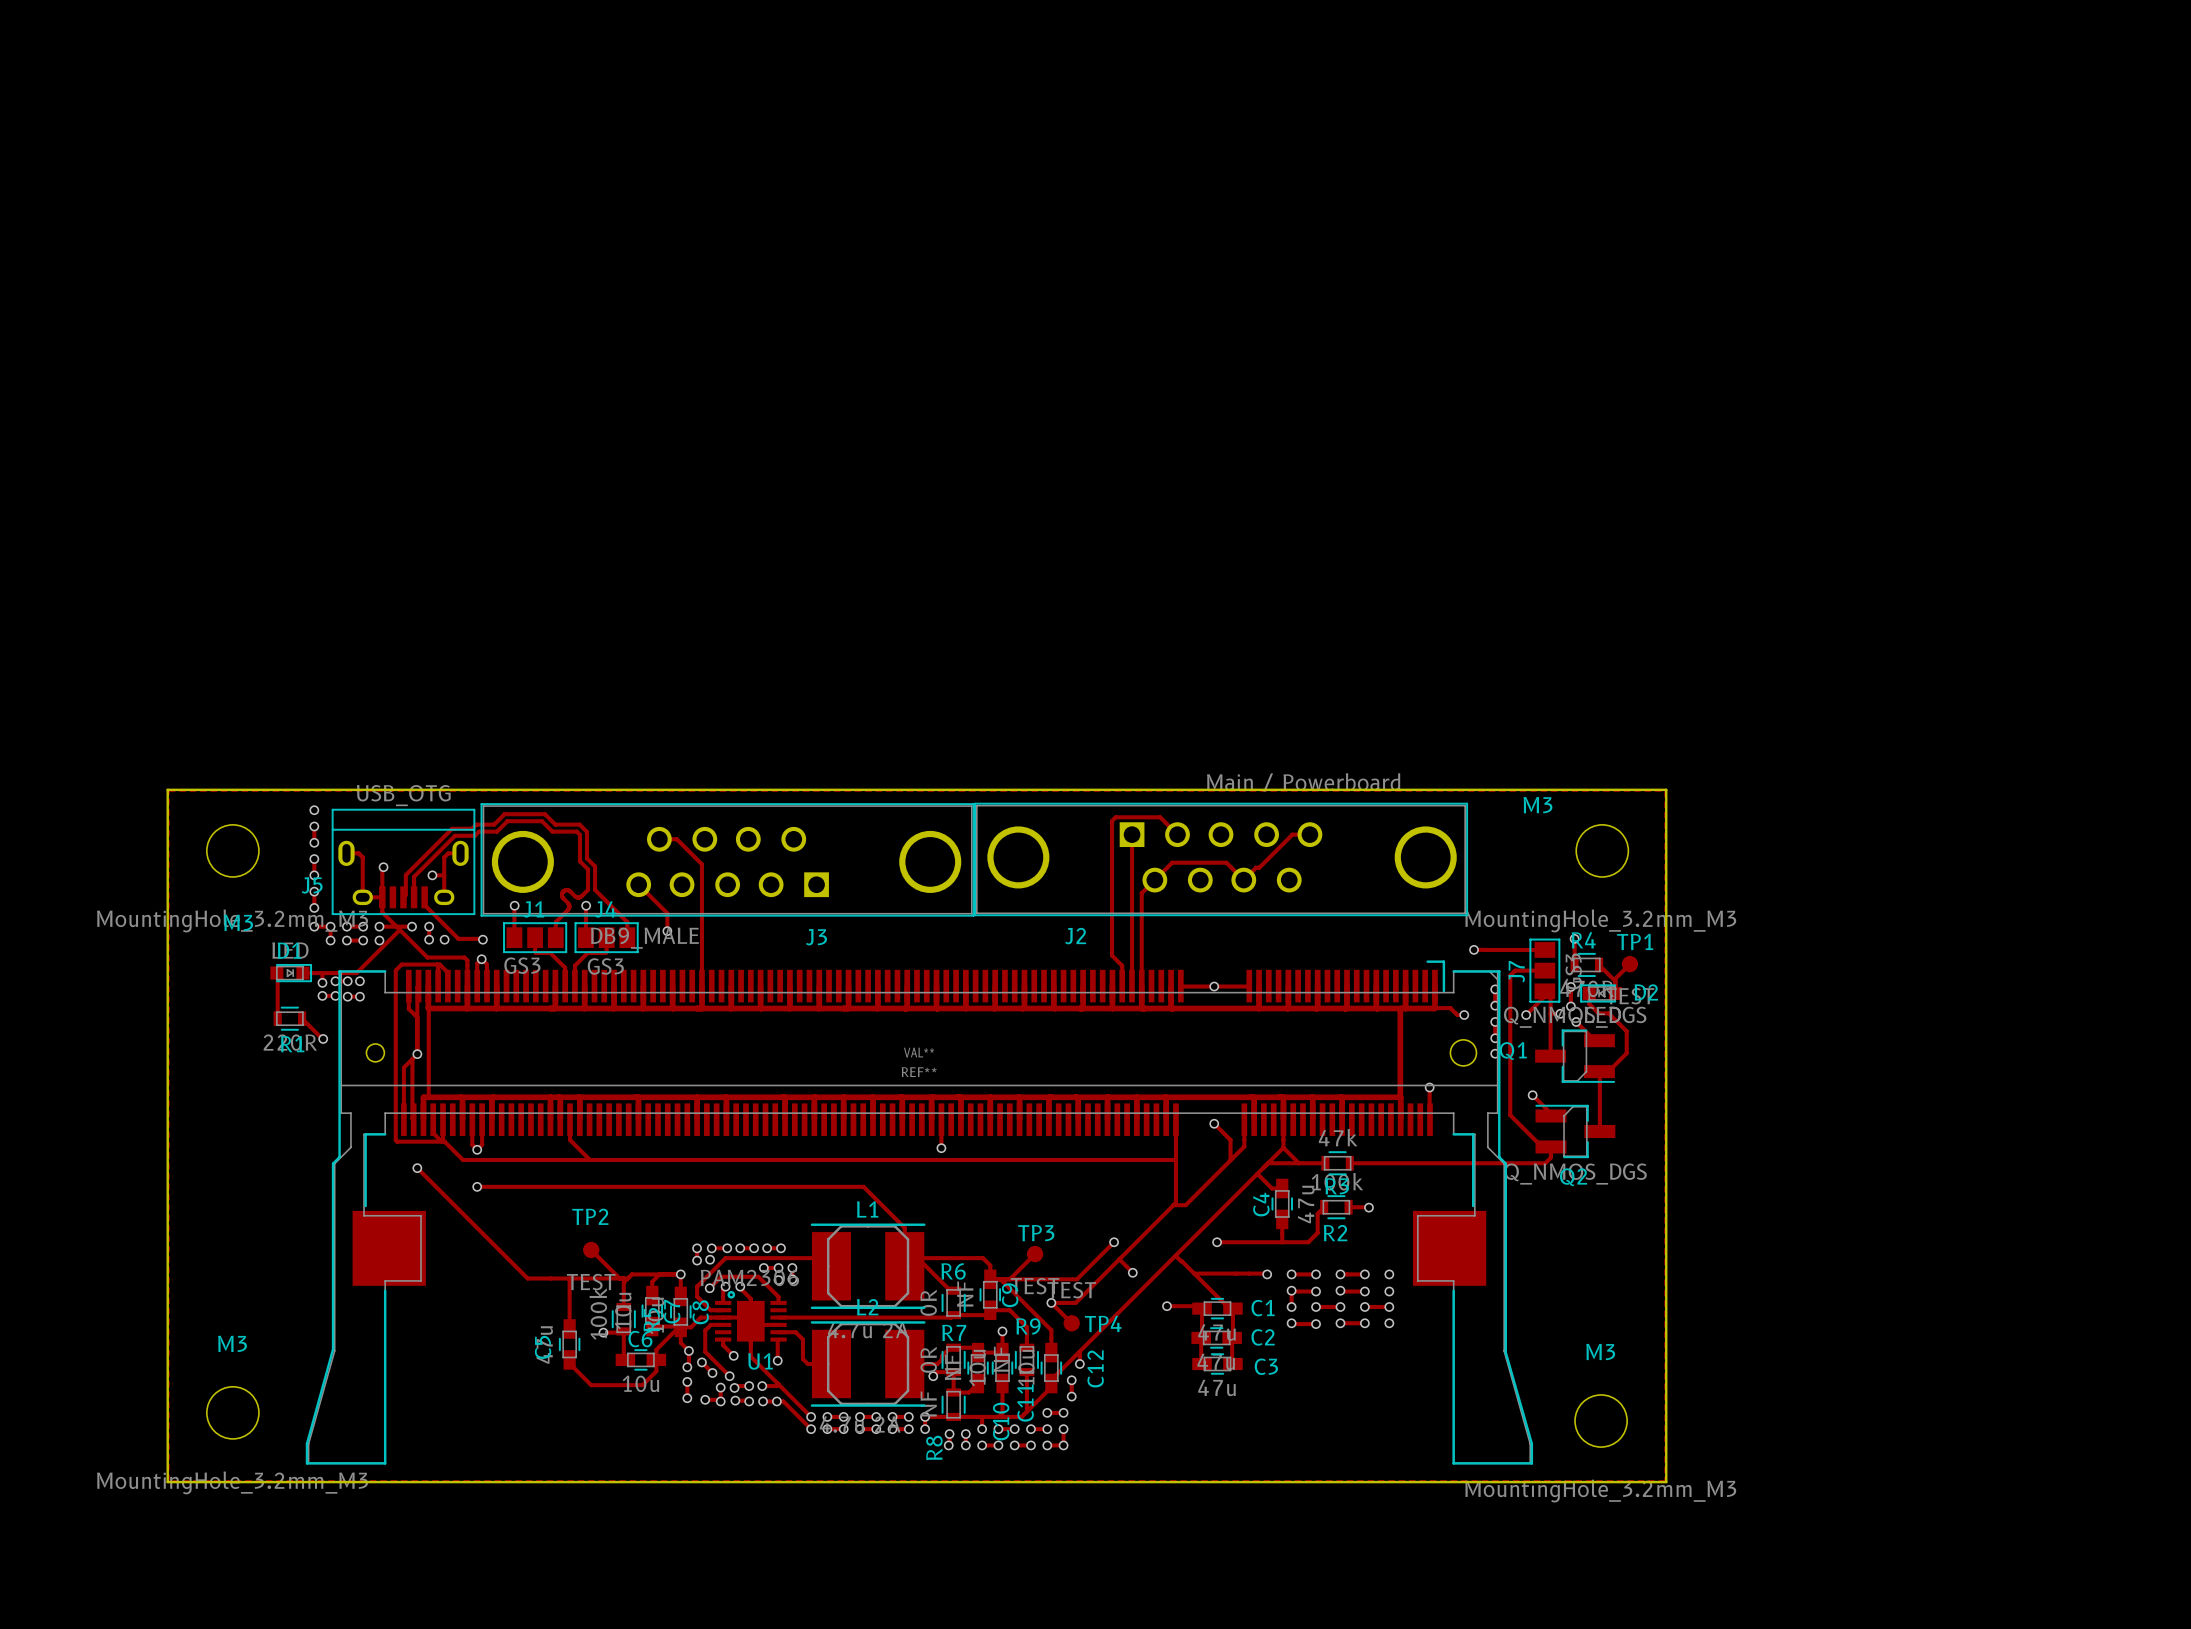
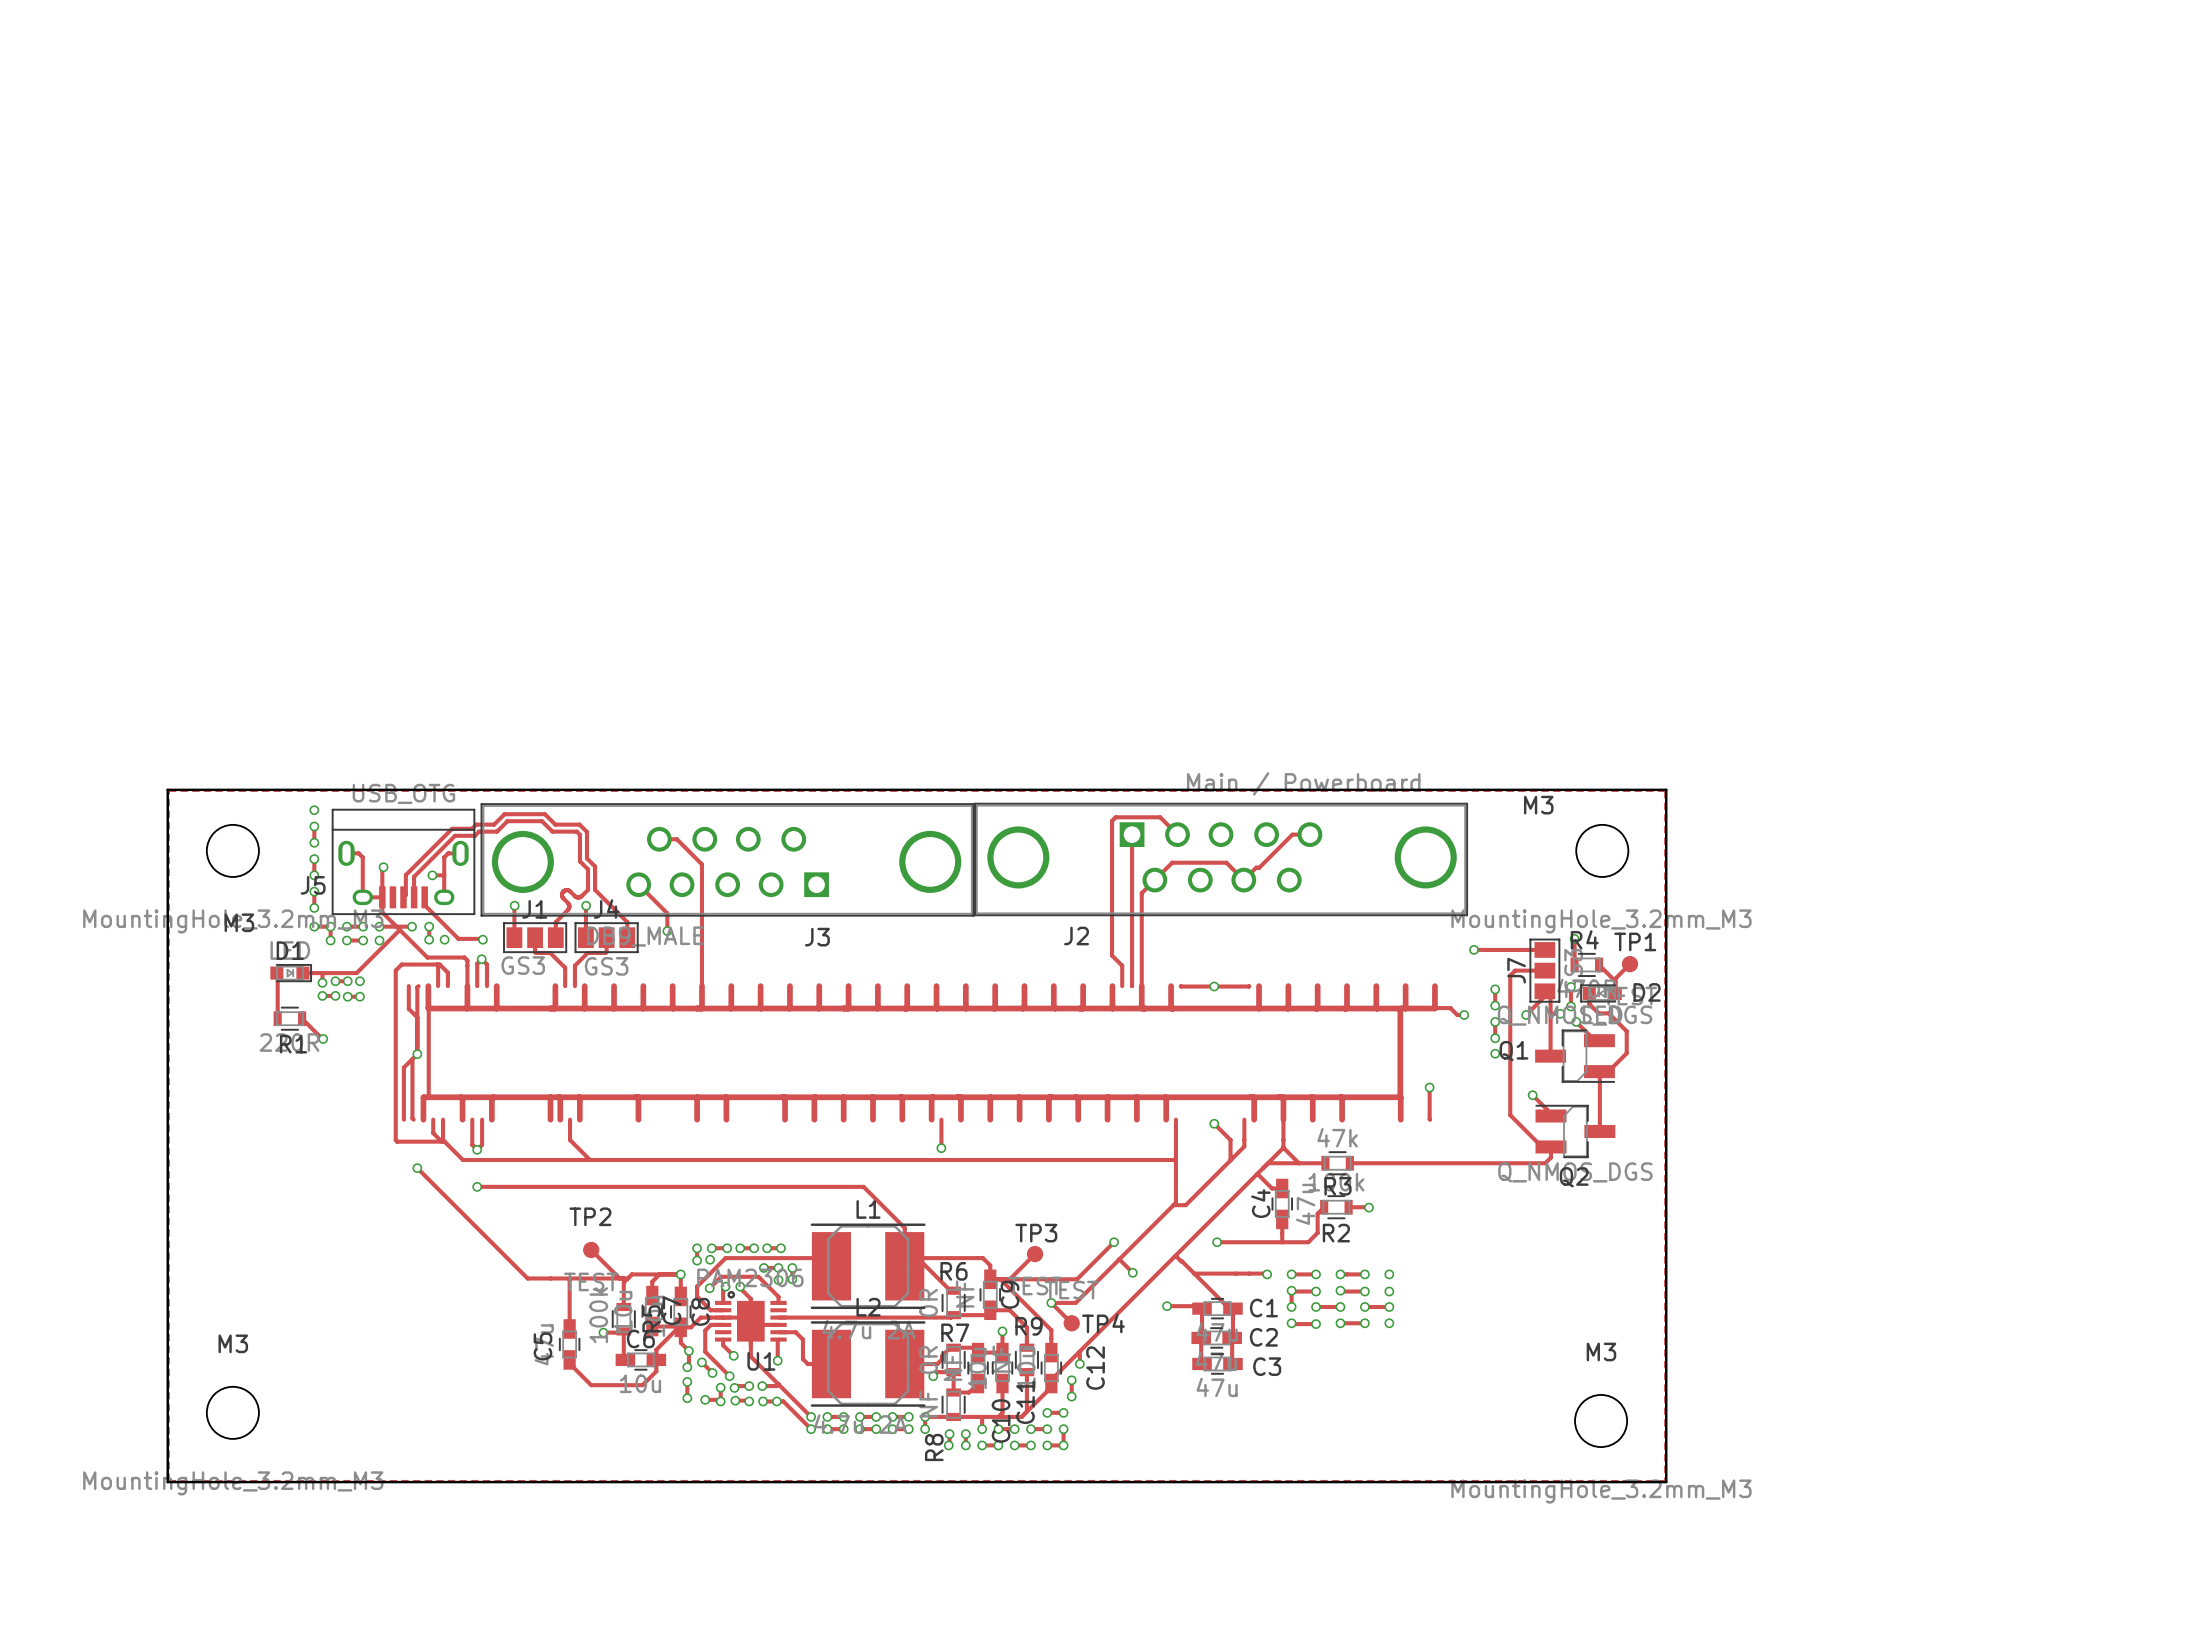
REF**: VAL** (919, 1212) -> none

